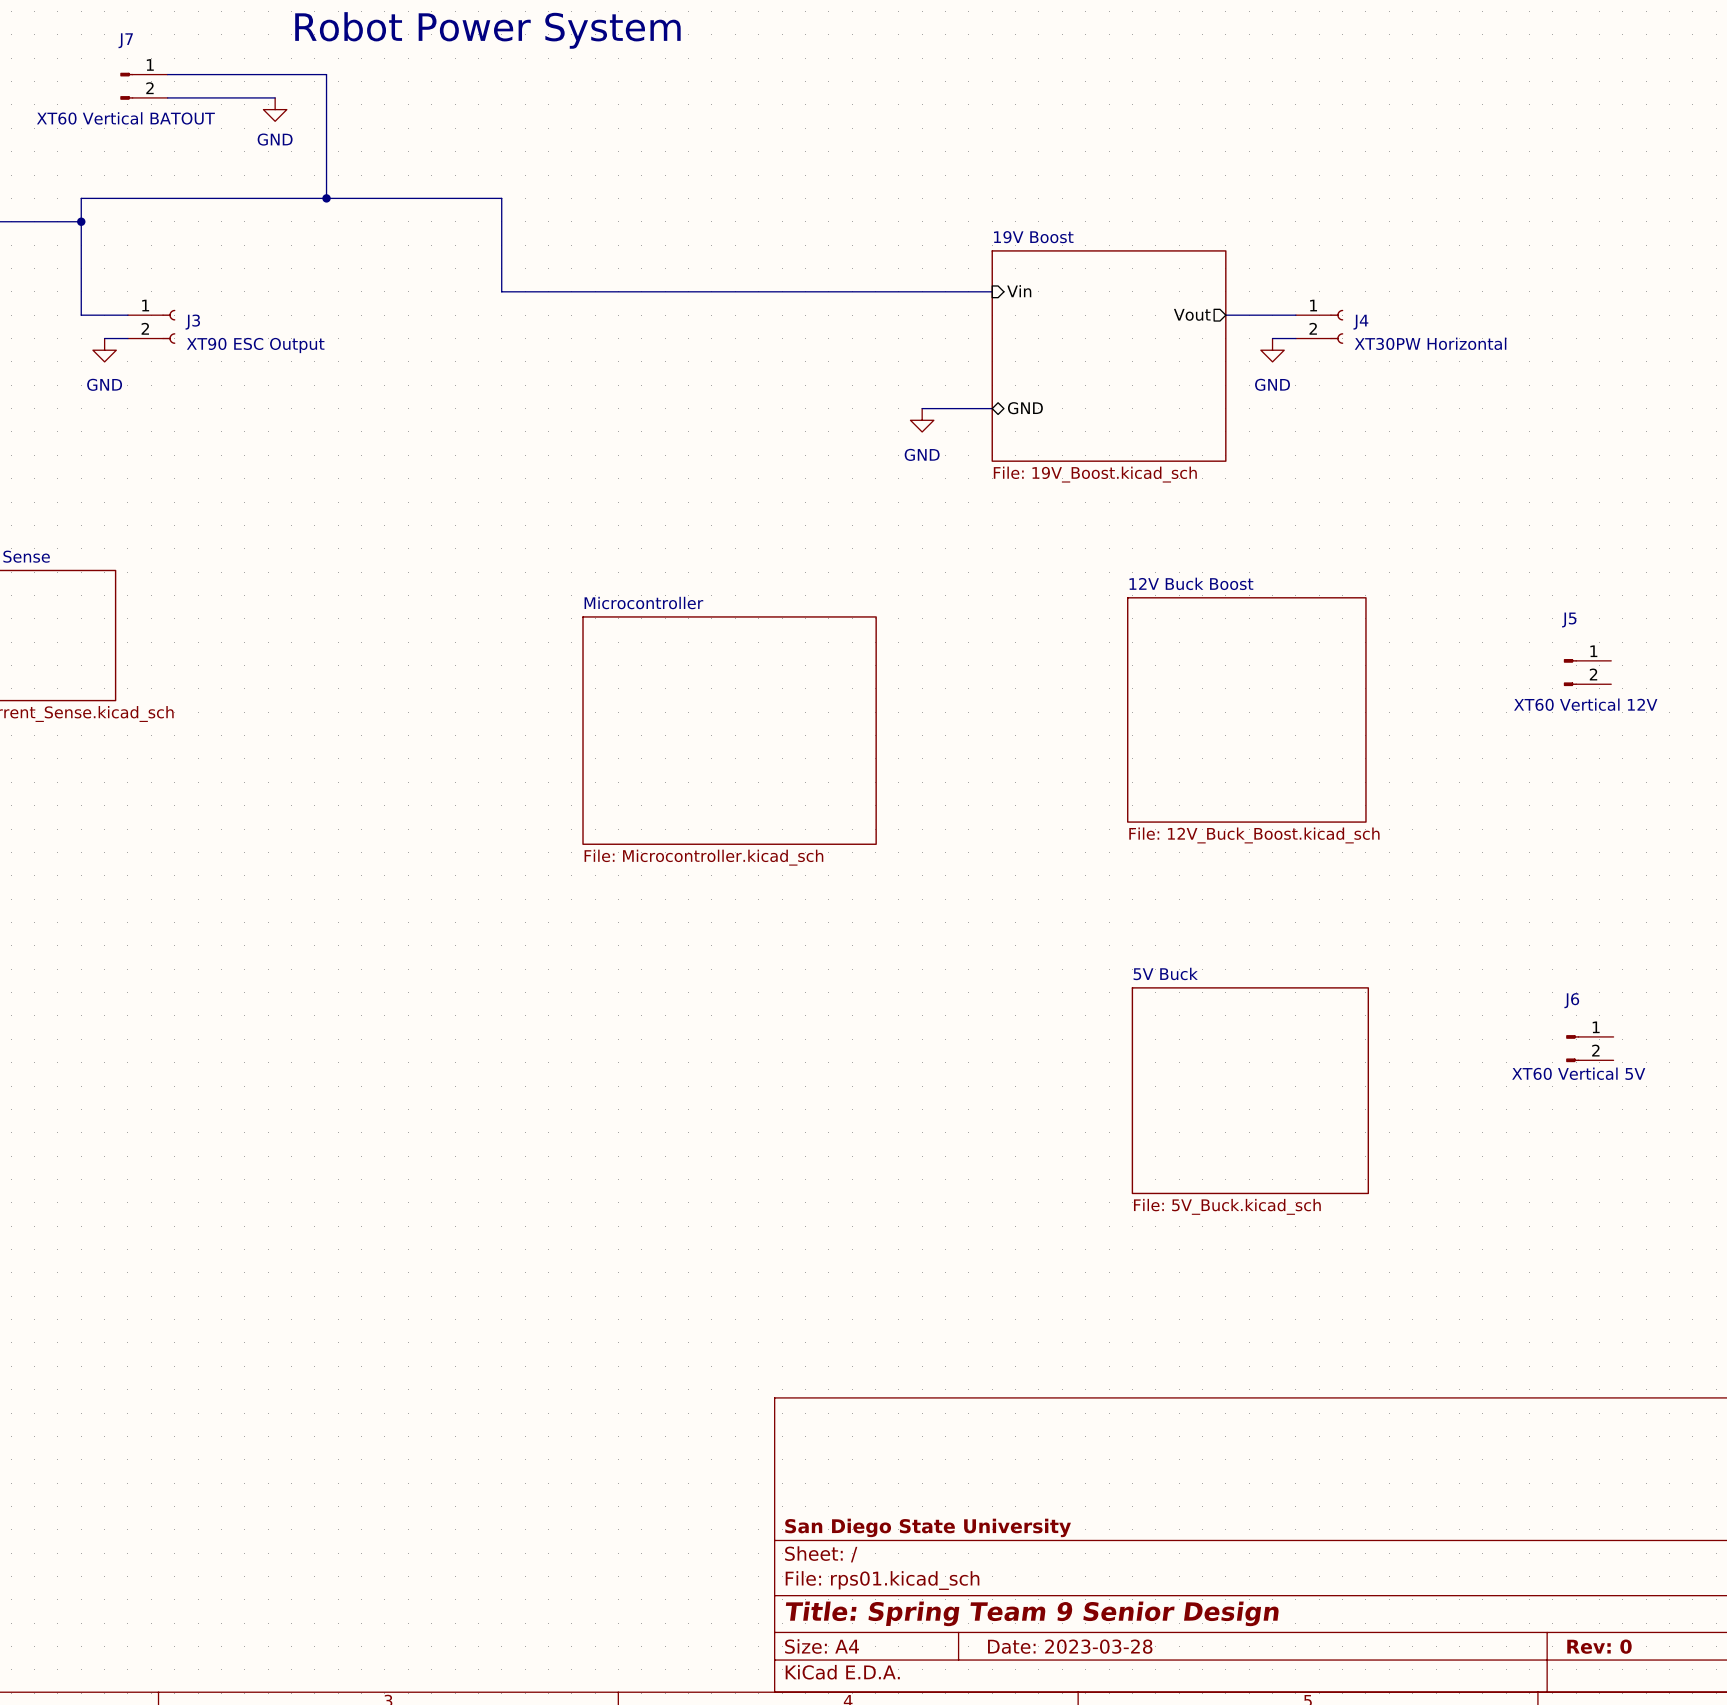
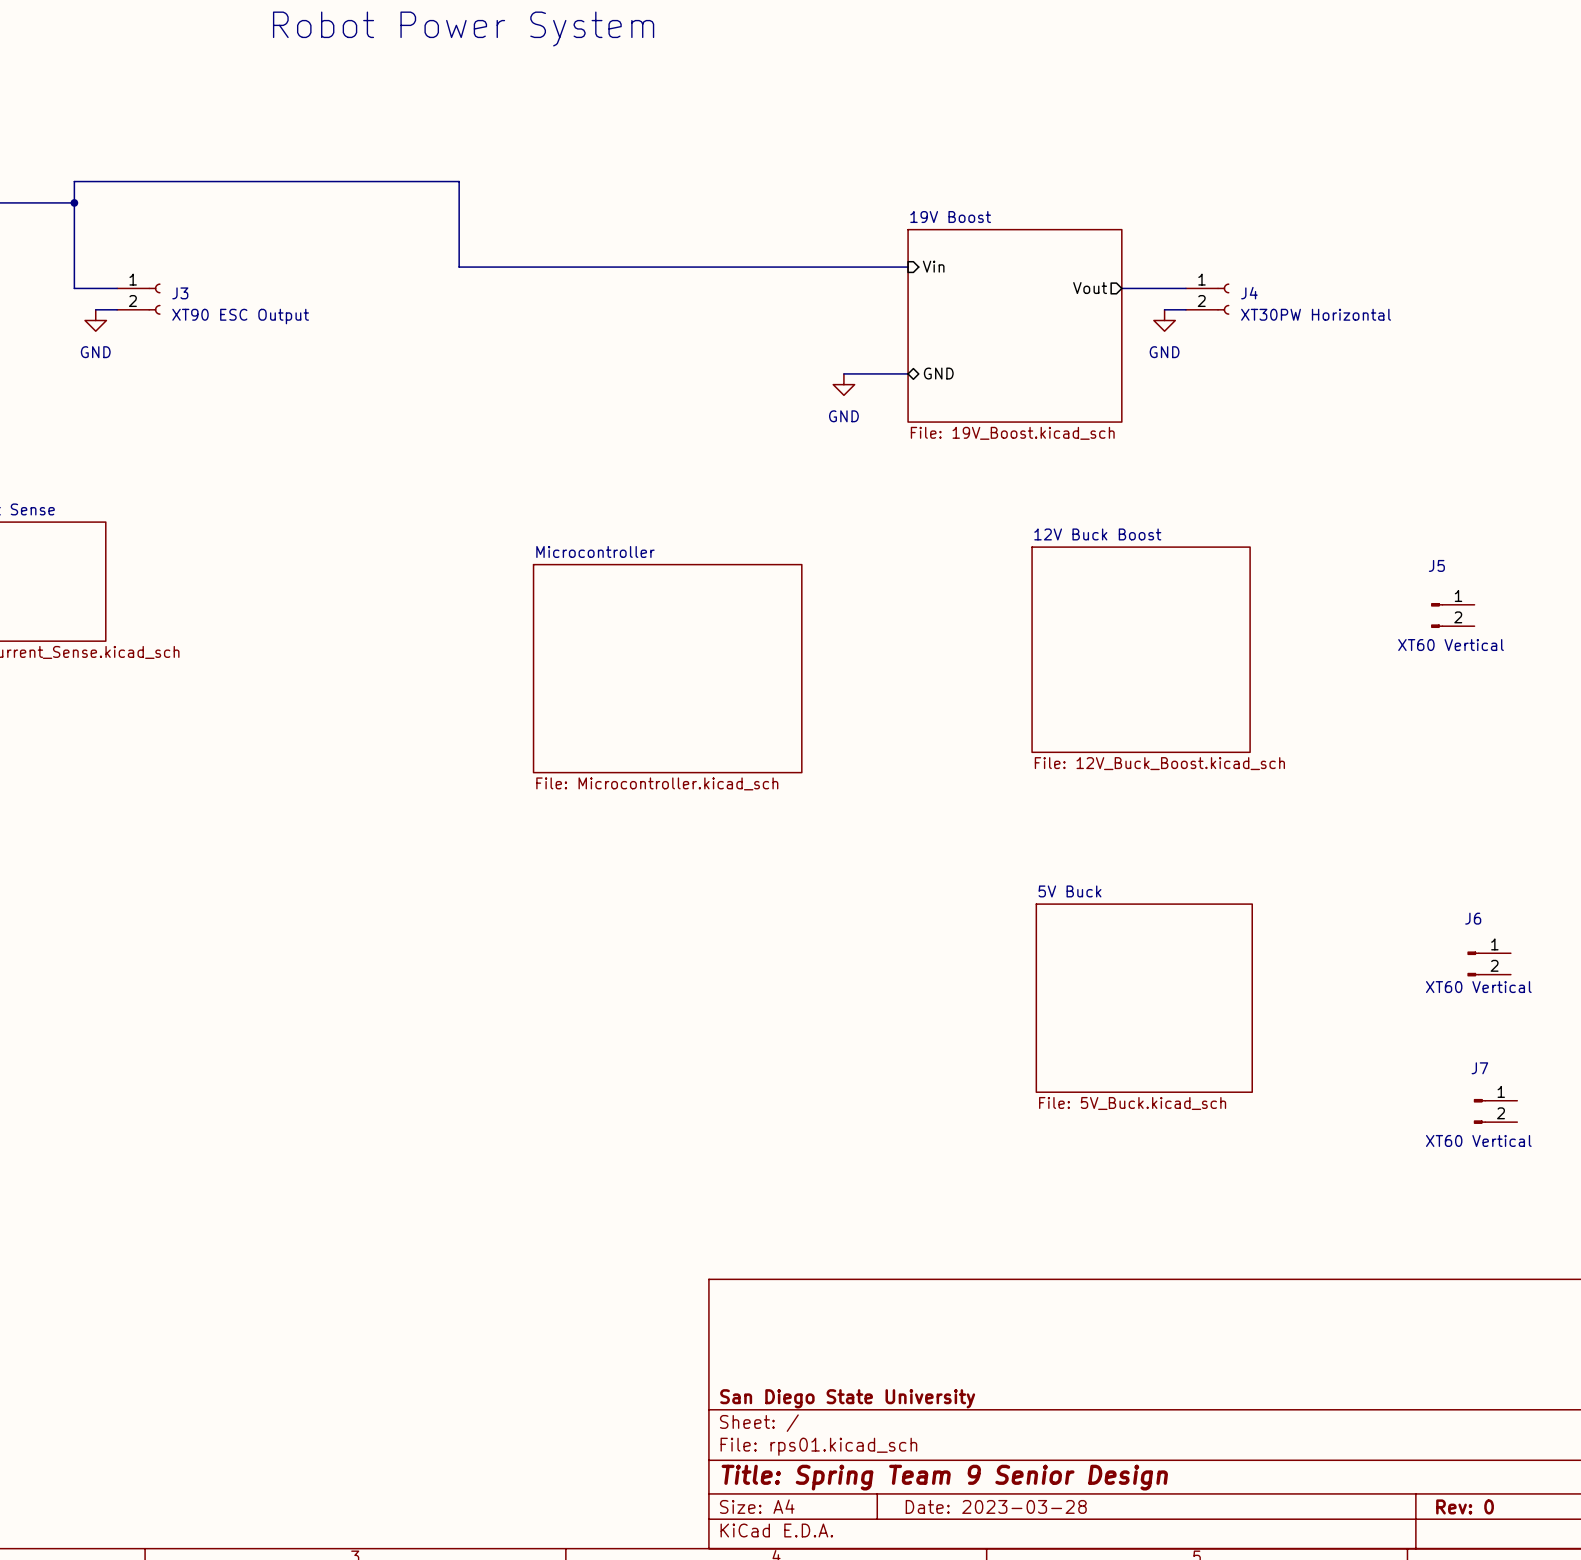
wire: (167, 74) (326, 74) (326, 198) -> none
J7 position: (143, 86) -> (1495, 1111)
wire: (167, 97) (275, 97) -> none
power symbol: GND (275, 109) -> none
J7 value: XT60 Vertical BATOUT (125, 118) -> XT60 Vertical (1478, 1140)
junction: (326, 198) -> none
J5 value: XT60 Vertical 12V (1585, 704) -> XT60 Vertical (1451, 645)
J6 position: (1589, 1048) -> (1489, 963)
J6 value: XT60 Vertical 5V (1578, 1073) -> XT60 Vertical (1478, 987)

